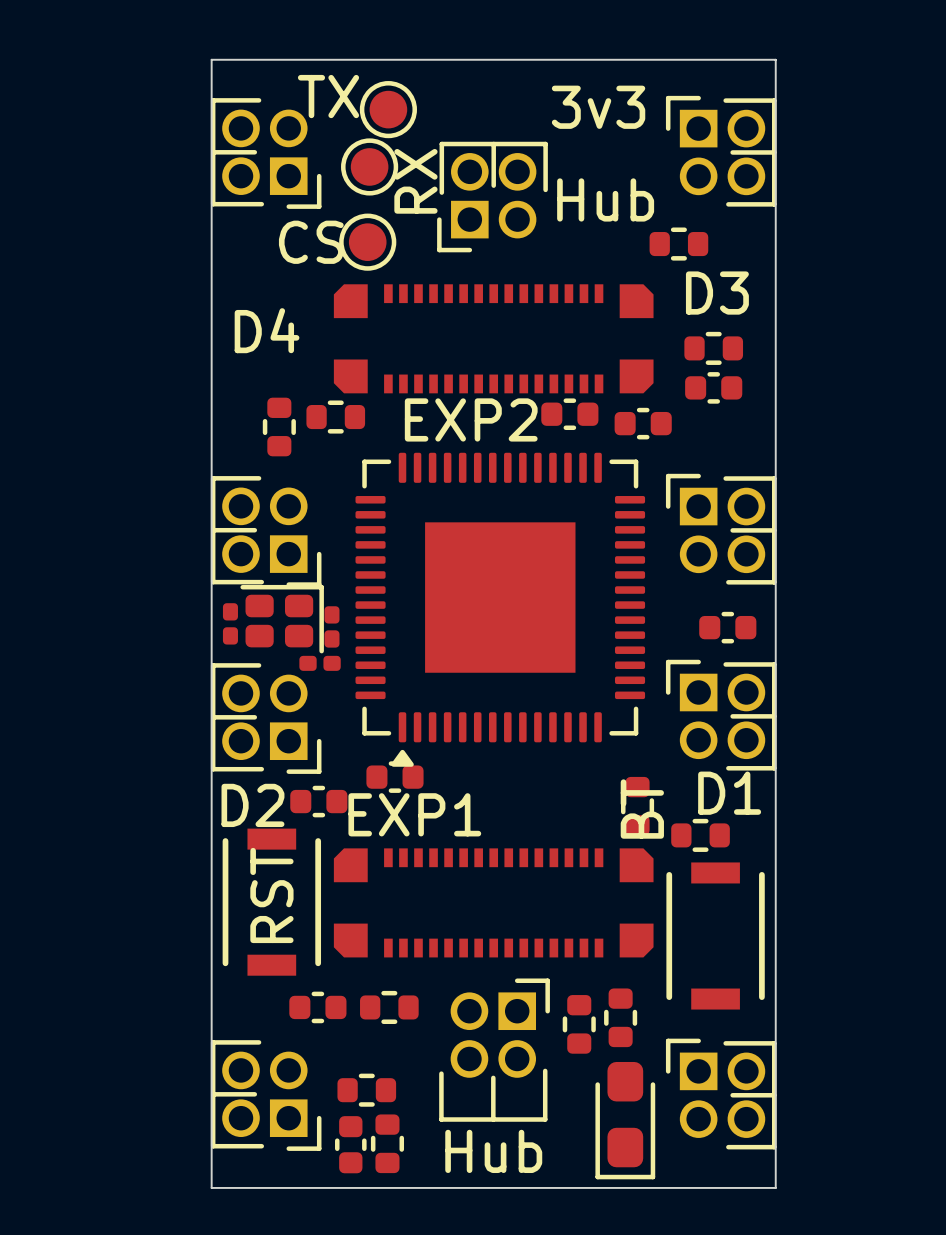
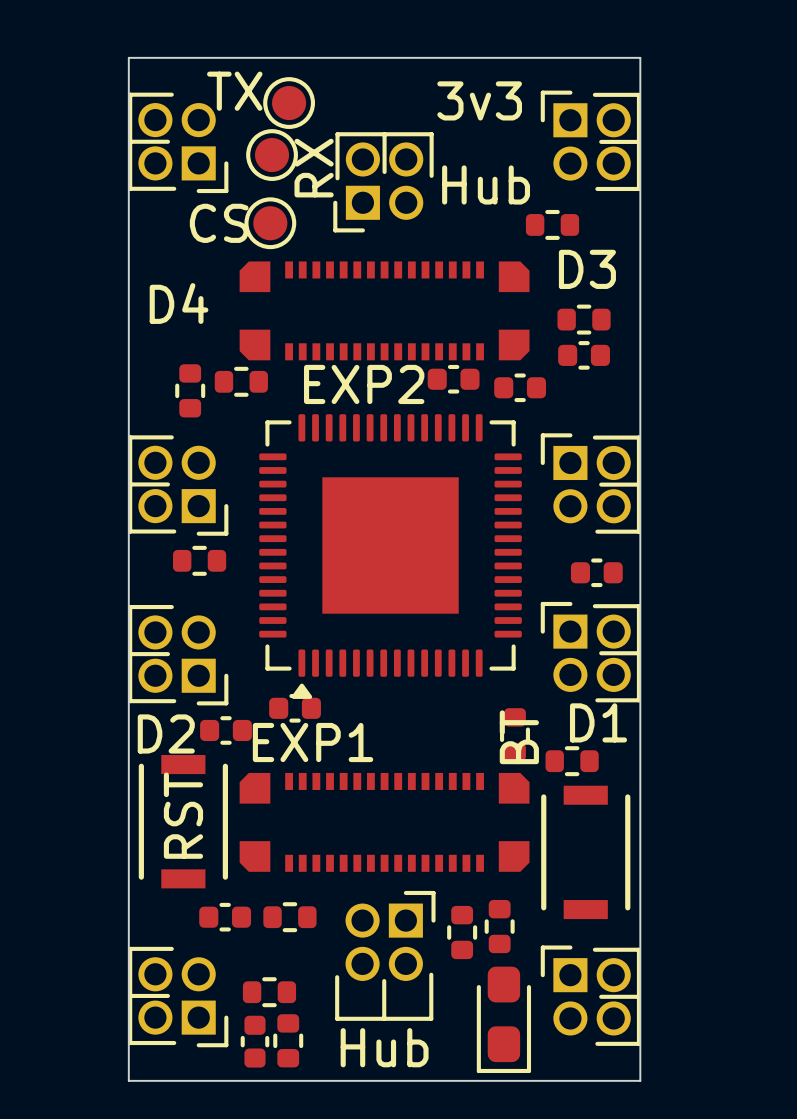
part footprint: [240, 584, 324, 654] -> [172, 545, 227, 576]
part: (230, 623) -> none
part: (331, 626) -> none
part: (320, 663) -> none

